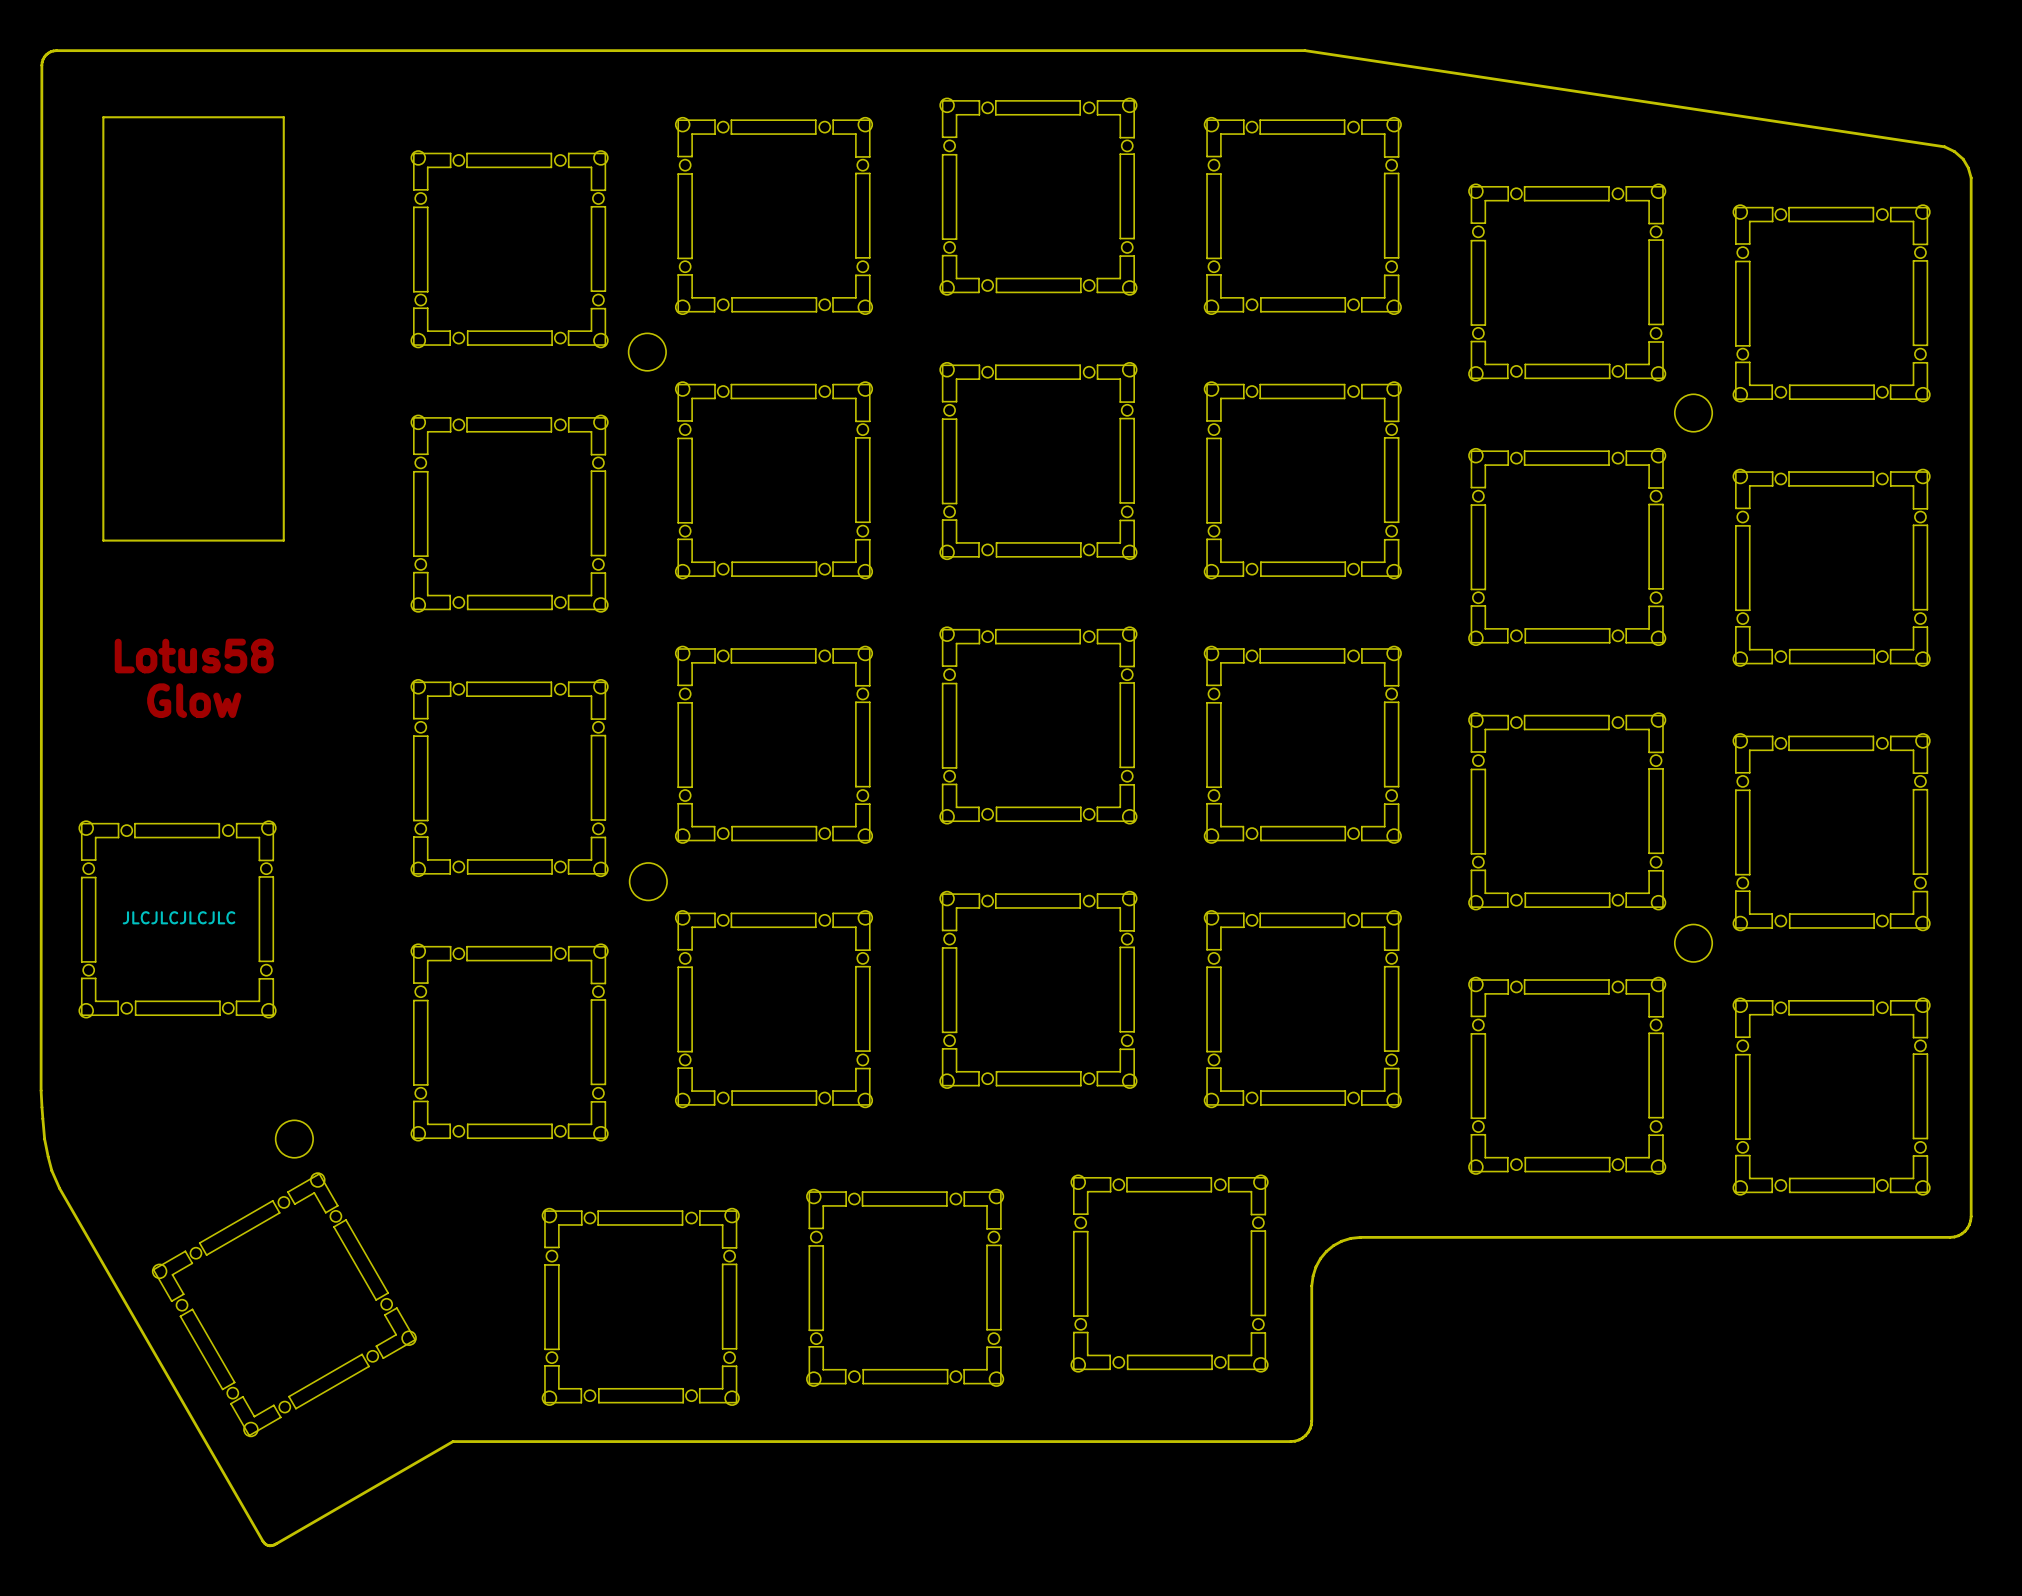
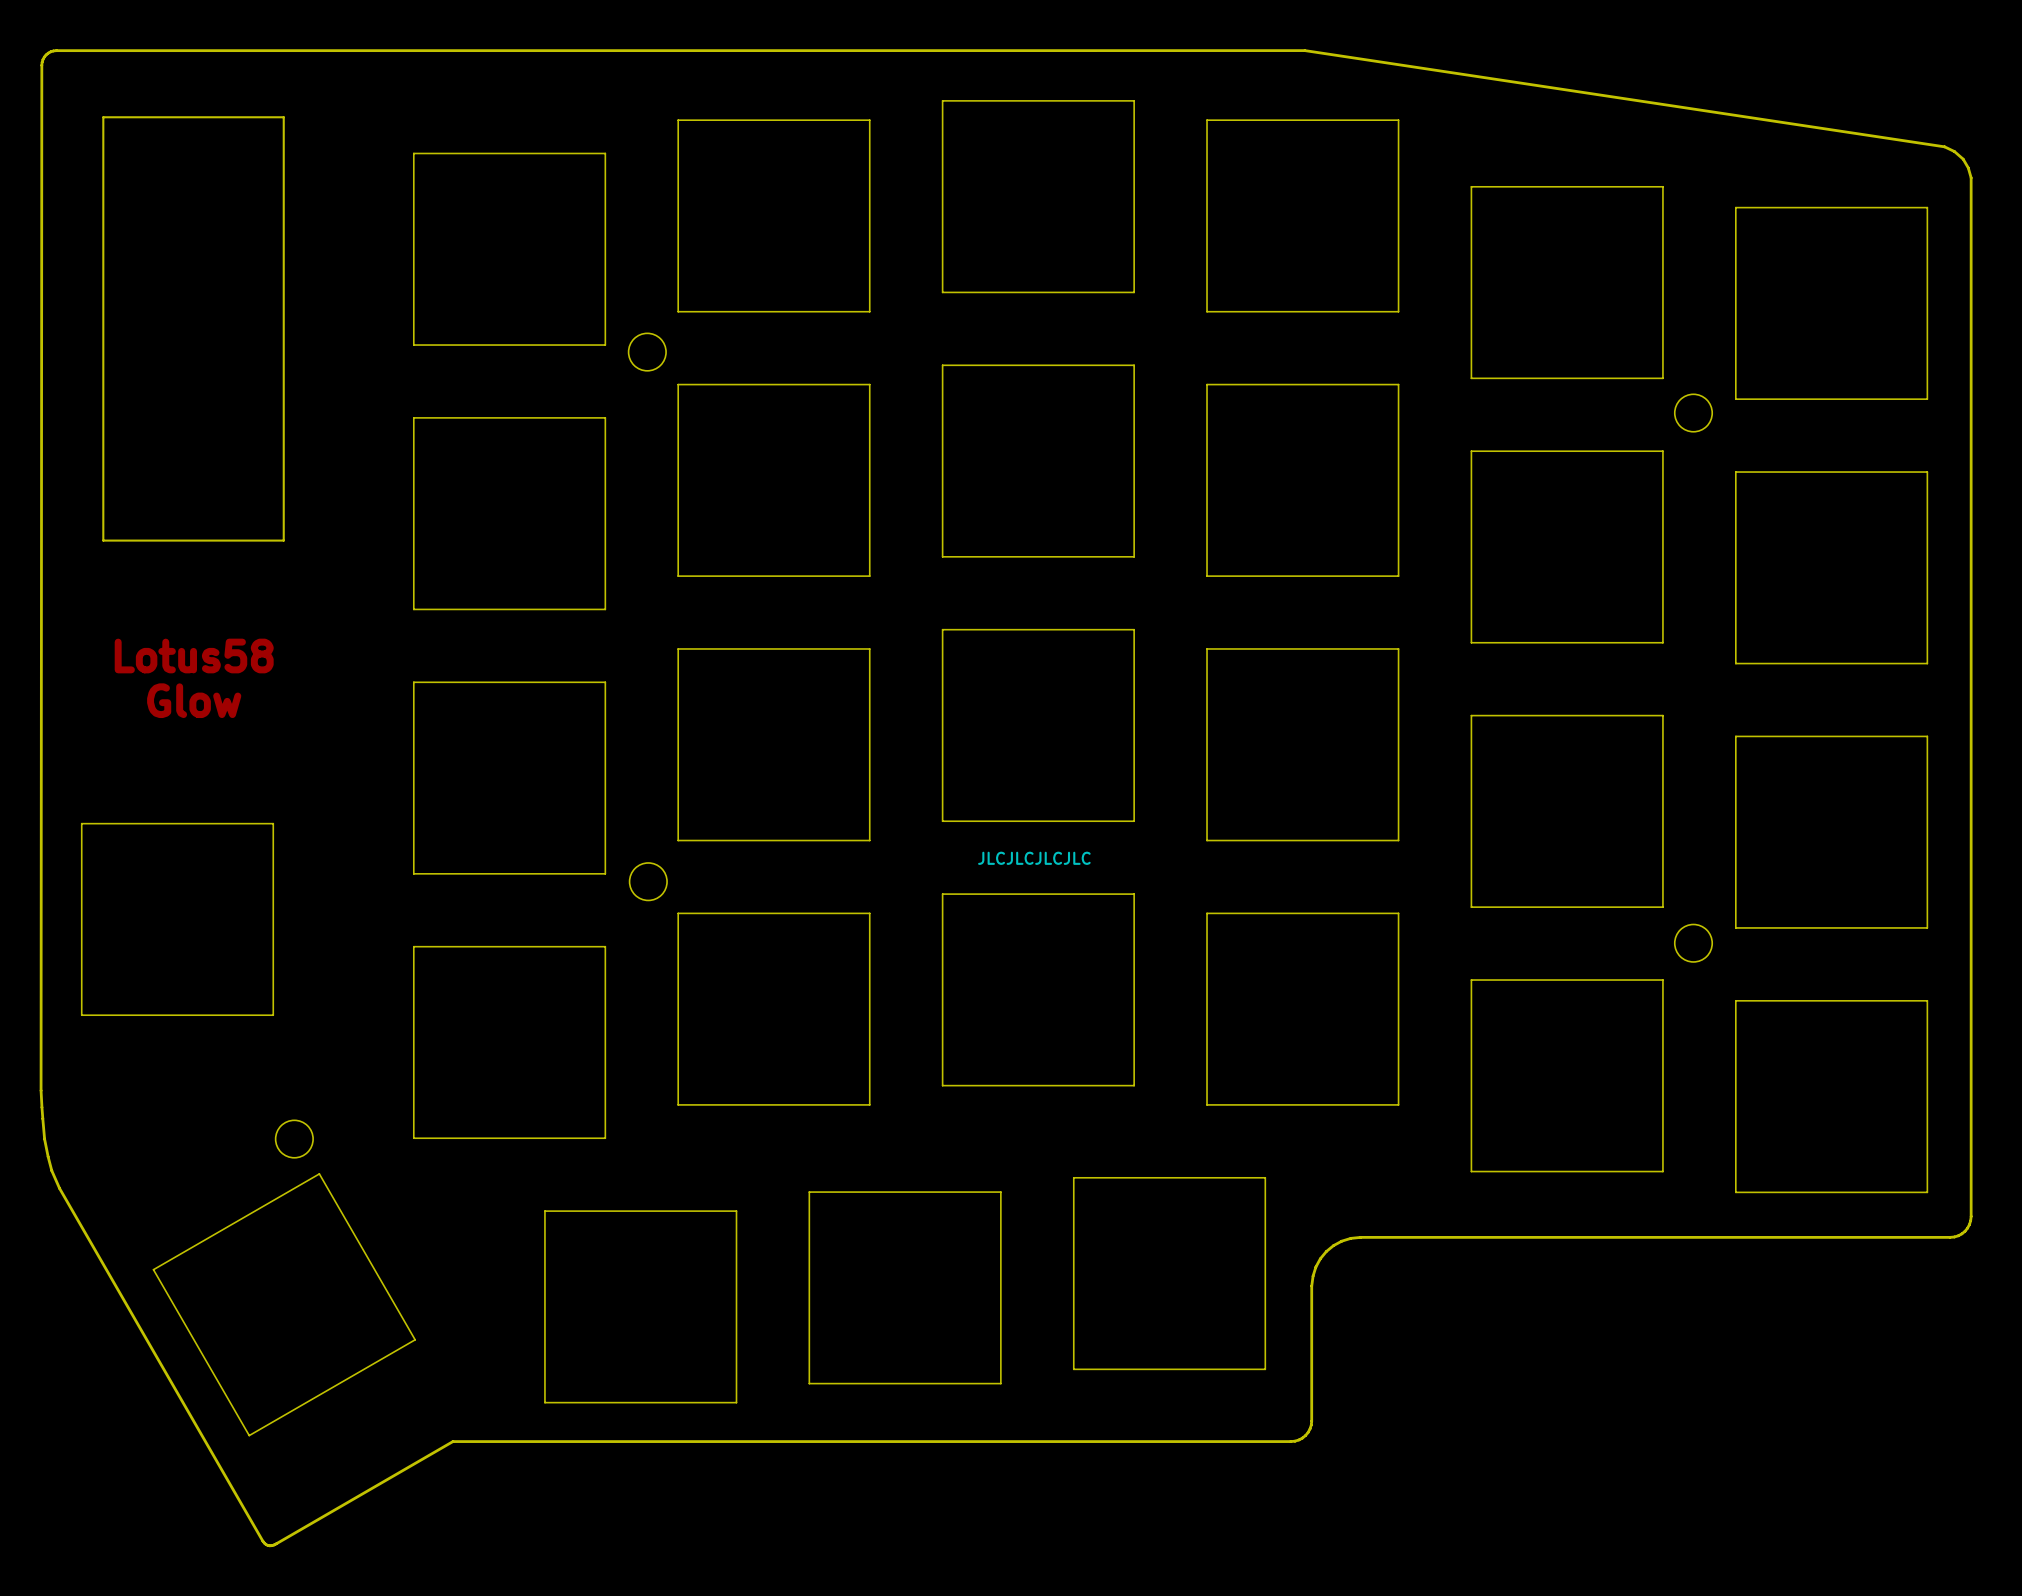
drawing: none -> [941, 100, 1135, 294]
drawing: none -> [677, 119, 871, 313]
drawing: none -> [1206, 119, 1400, 313]
drawing: none -> [413, 152, 607, 346]
drawing: none -> [1470, 186, 1664, 380]
part: (1038, 196) -> none
drawing: none -> [1735, 206, 1929, 400]
part: (774, 215) -> none
part: (1302, 215) -> none
part: (509, 249) -> none
part: (1567, 282) -> none
part: (1831, 303) -> none
drawing: none -> [941, 364, 1135, 558]
drawing: none -> [677, 383, 871, 577]
drawing: none -> [1206, 383, 1400, 577]
drawing: none -> [413, 417, 607, 611]
drawing: none -> [1470, 450, 1664, 644]
part: (1038, 461) -> none
drawing: none -> [1735, 471, 1929, 665]
part: (774, 480) -> none
part: (1302, 480) -> none
part: (509, 513) -> none
part: (1567, 546) -> none
part: (1831, 567) -> none
drawing: none -> [941, 629, 1135, 822]
drawing: none -> [677, 648, 871, 842]
drawing: none -> [1206, 648, 1400, 842]
drawing: none -> [413, 681, 607, 875]
drawing: none -> [1470, 714, 1664, 908]
part: (1038, 725) -> none
drawing: none -> [1735, 735, 1929, 929]
part: (774, 744) -> none
part: (1302, 744) -> none
part: (509, 778) -> none
part: (1567, 811) -> none
drawing: none -> [81, 822, 274, 1016]
part: (1831, 832) -> none
text: none -> JLCJLCJLCJLC (1034, 858)
drawing: none -> [941, 893, 1135, 1087]
drawing: none -> [677, 912, 871, 1106]
drawing: none -> [1206, 912, 1400, 1106]
text: JLCJLCJLCJLC (179, 917) -> none
part: (177, 919) -> none
drawing: none -> [413, 946, 607, 1139]
drawing: none -> [1470, 979, 1664, 1173]
part: (1038, 989) -> none
drawing: none -> [1735, 1000, 1929, 1194]
part: (774, 1009) -> none
part: (1302, 1009) -> none
part: (509, 1042) -> none
part: (1567, 1075) -> none
part: (1831, 1096) -> none
drawing: none -> [152, 1173, 416, 1437]
drawing: none -> [1073, 1177, 1267, 1371]
drawing: none -> [808, 1191, 1002, 1385]
drawing: none -> [544, 1210, 738, 1404]
part: (1169, 1273) -> none
part: (905, 1287) -> none
part: (284, 1304) -> none
part: (640, 1306) -> none

